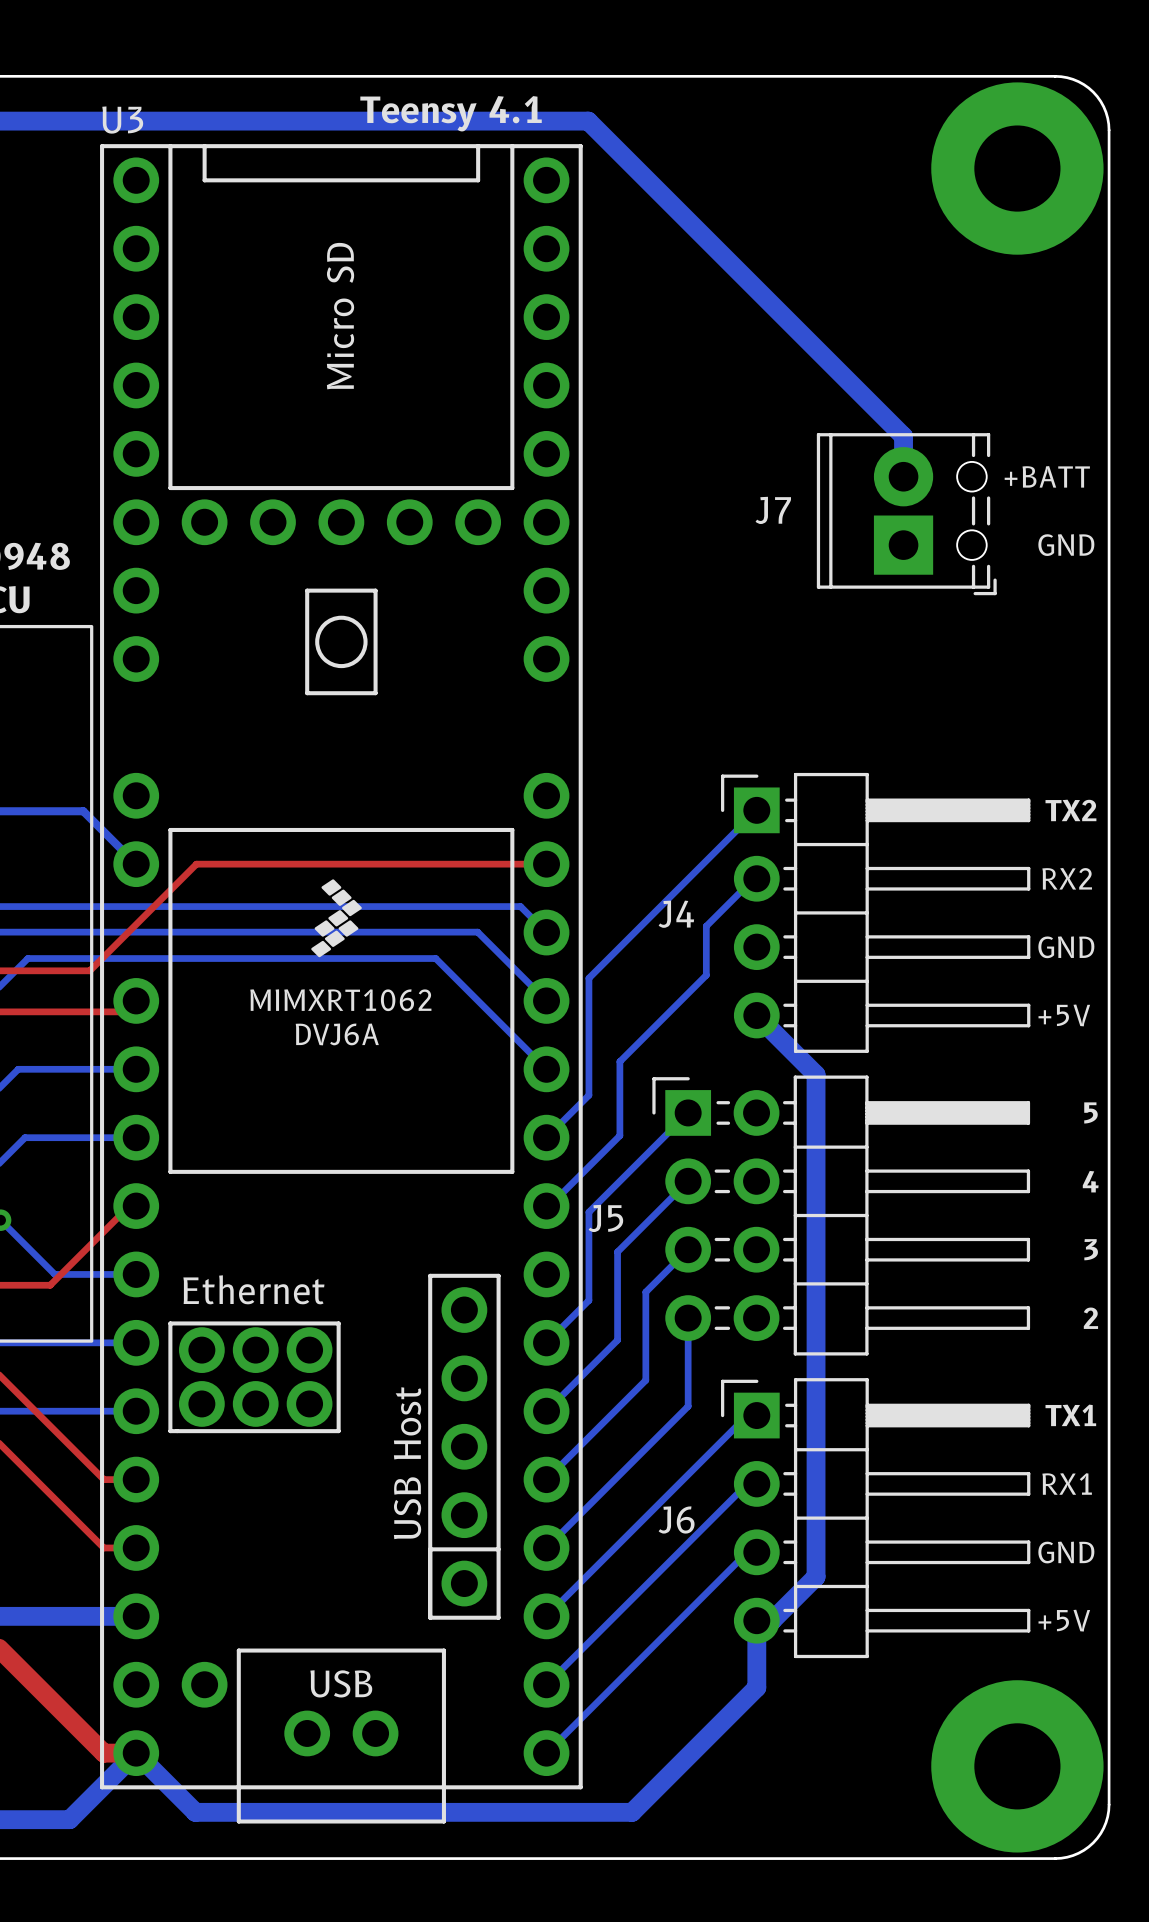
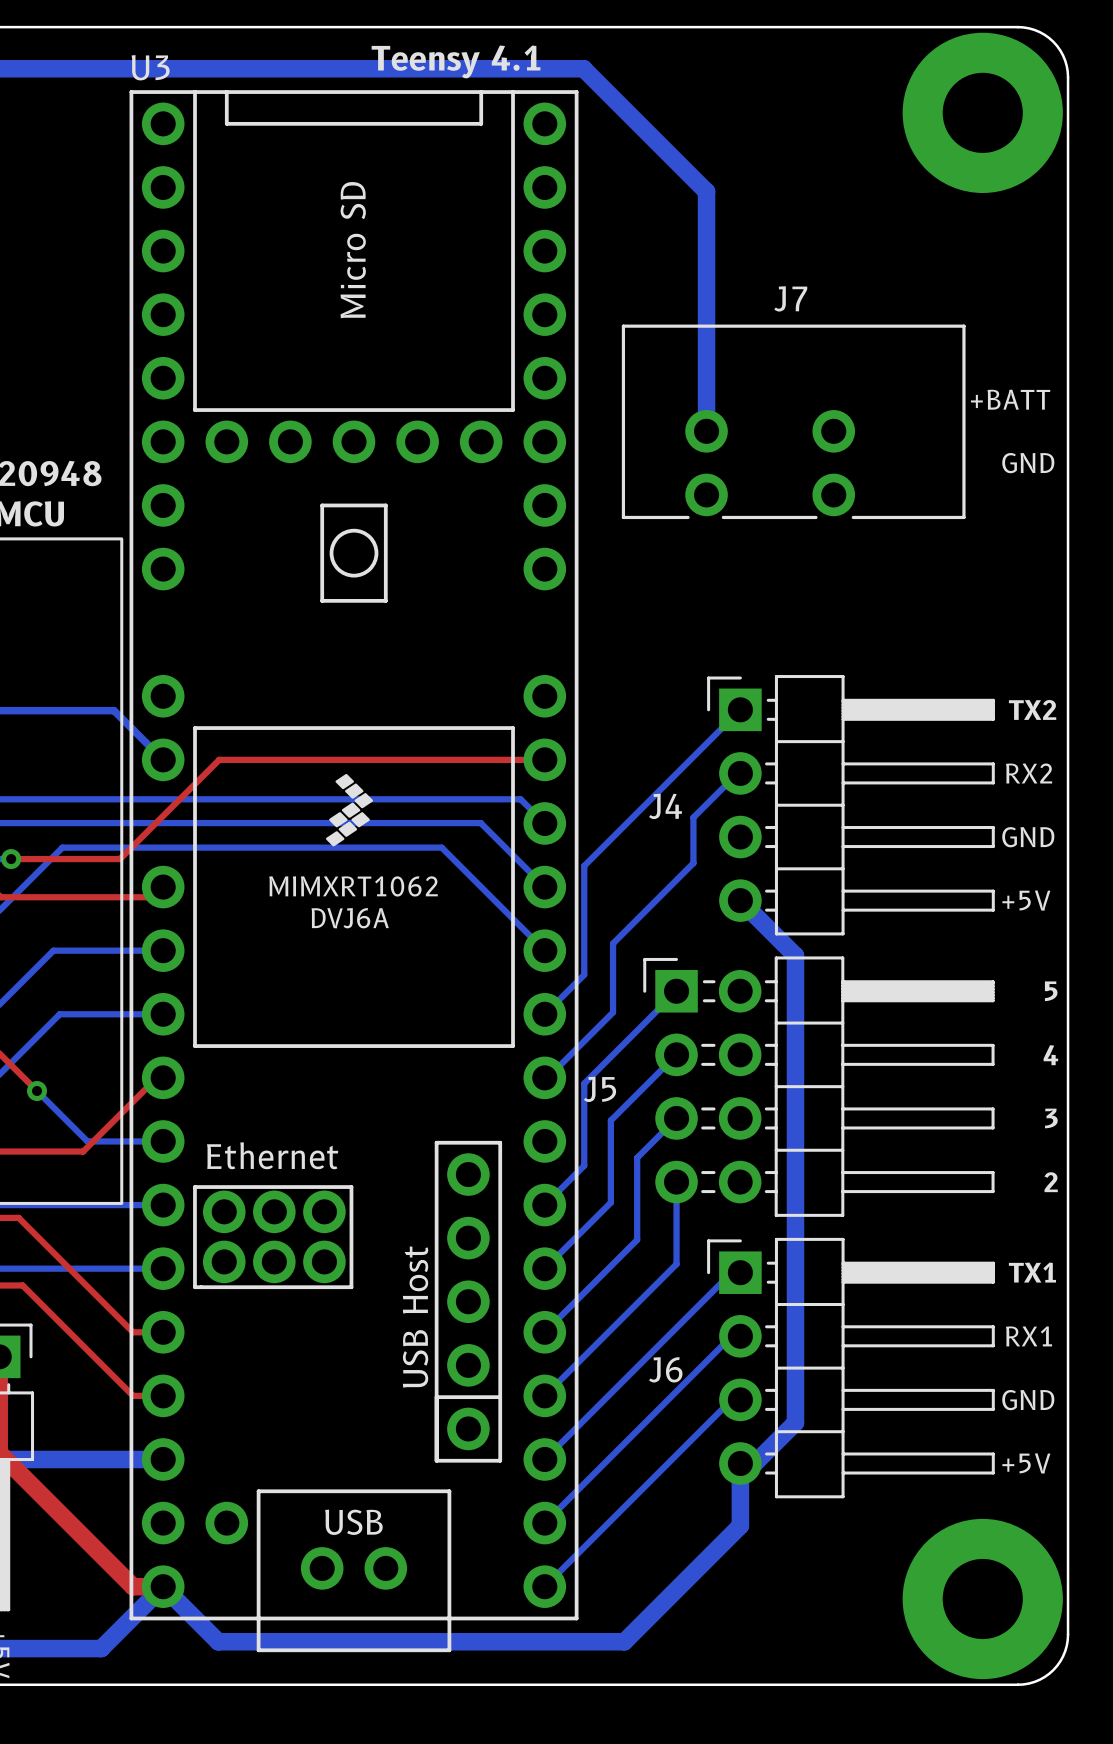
bottom track: (720, 253) (903, 436) (903, 476) -> (706, 191) (706, 431)
J7 footprint: [816, 433, 997, 596] -> [621, 324, 966, 520]
J7 name position: J7 (773, 510) -> J7 (790, 298)

